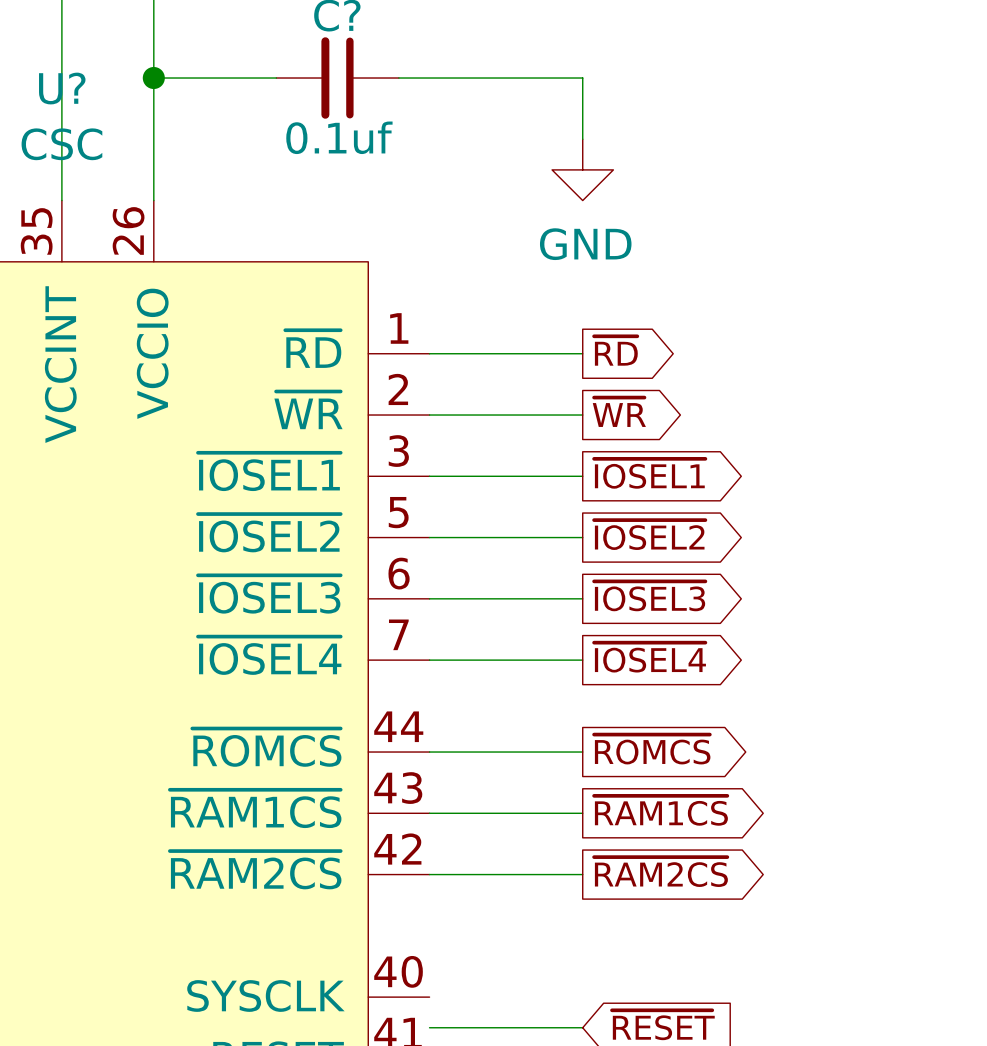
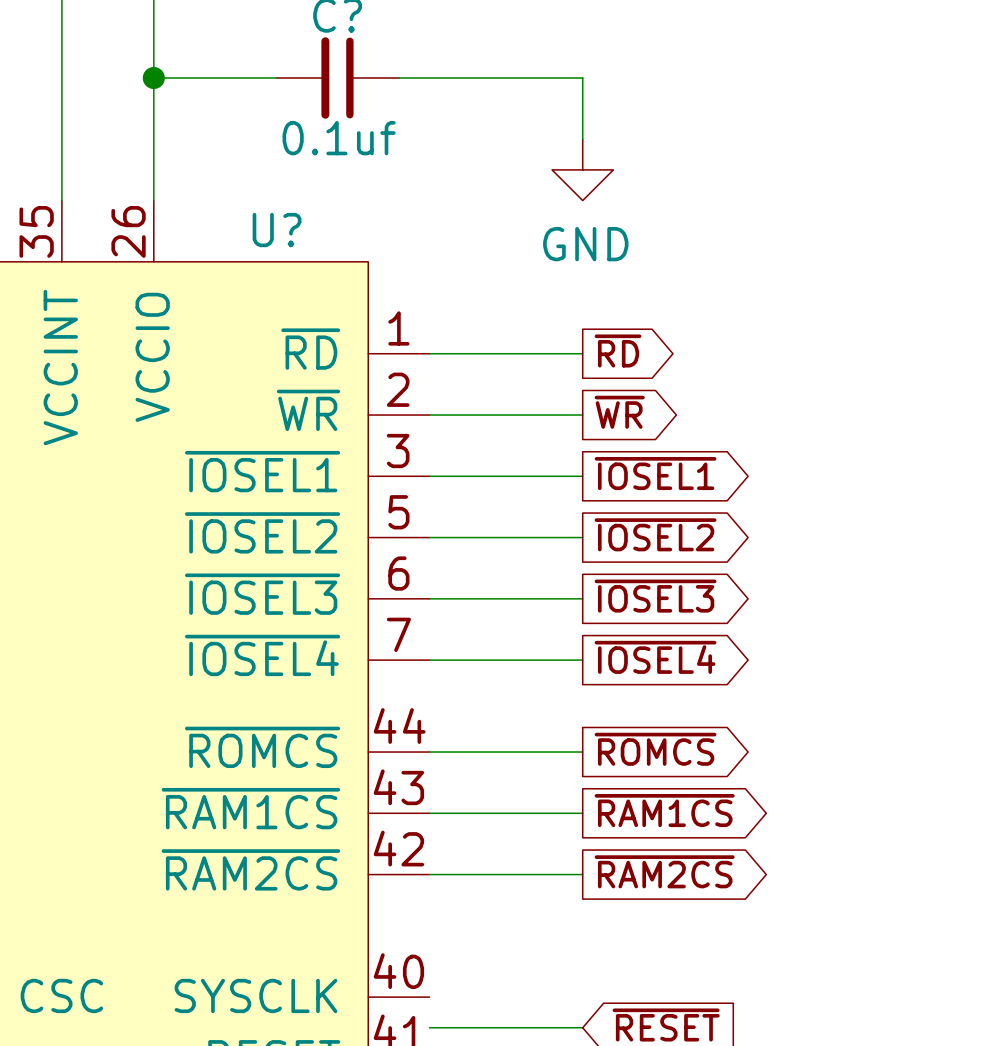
U? name position: U? (62, 88) -> U? (277, 230)
U? value position: CSC (61, 144) -> CSC (61, 995)

